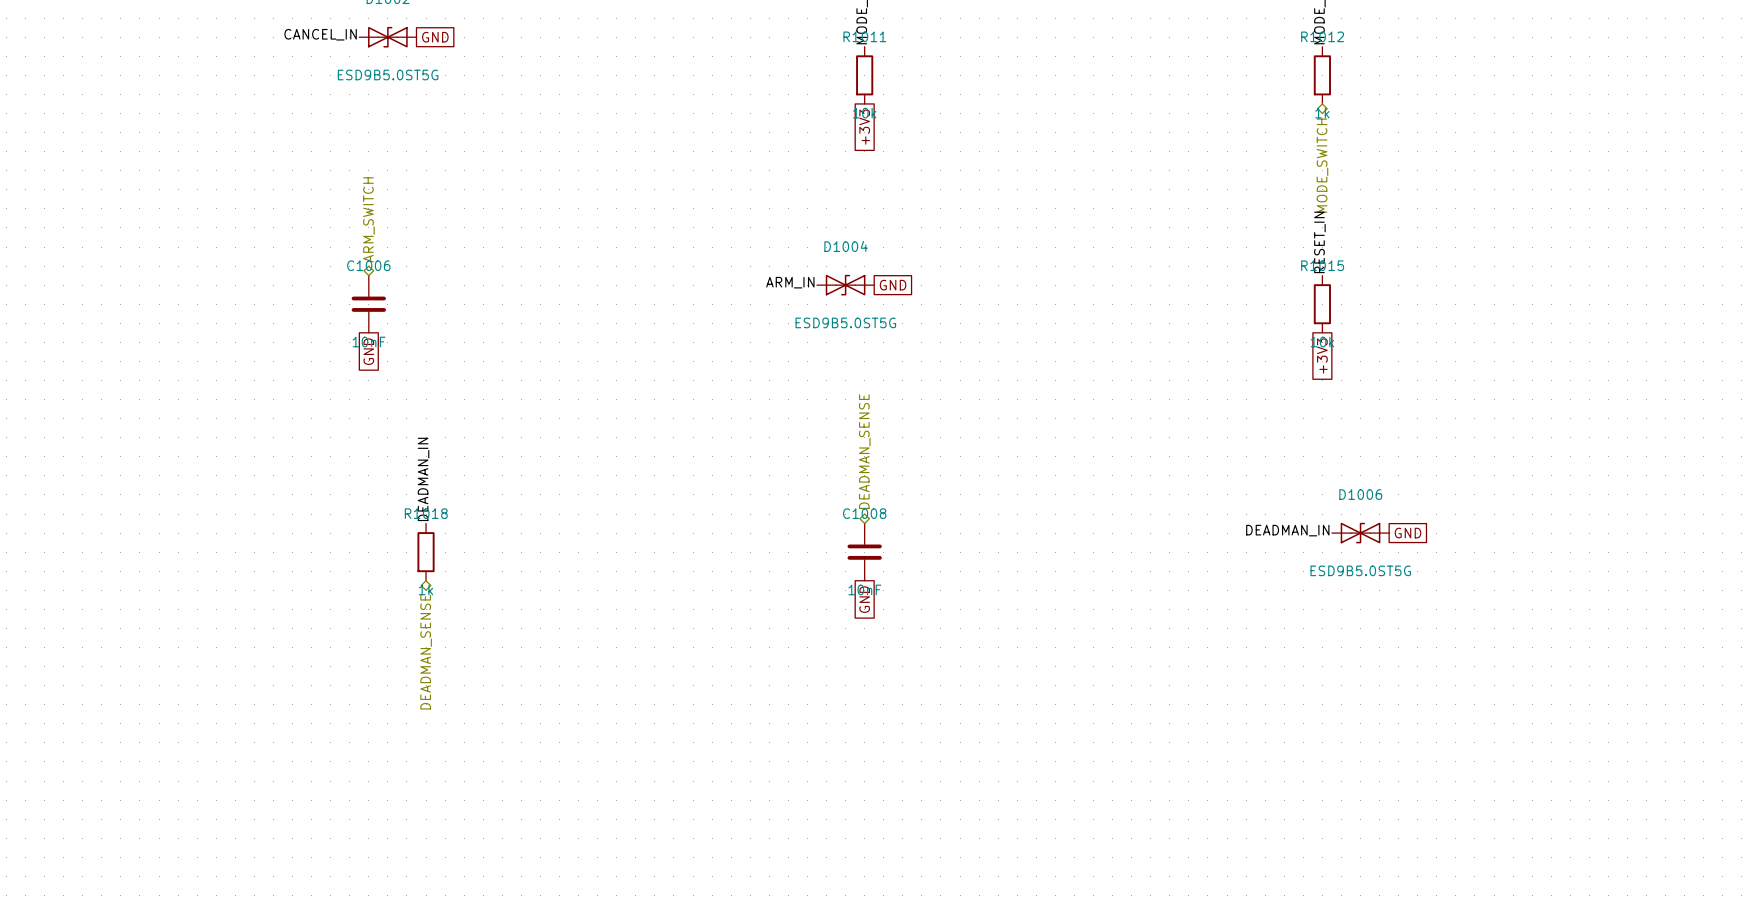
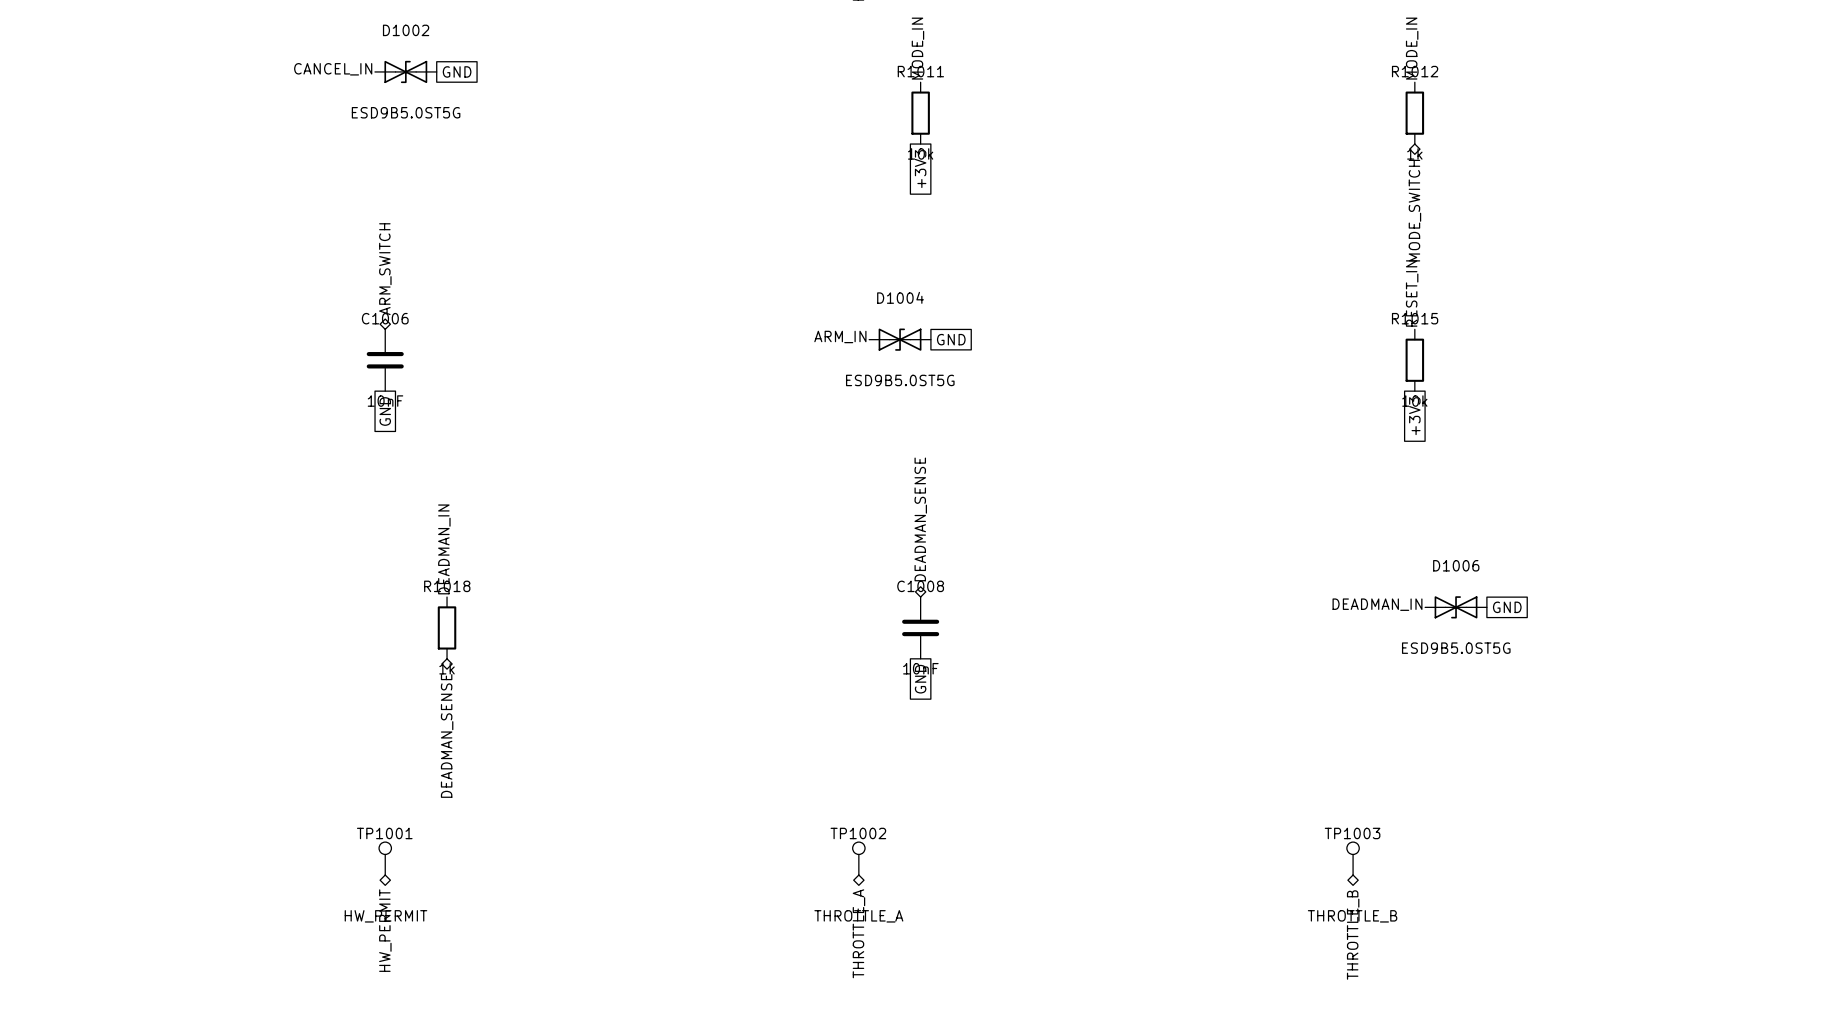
TP1001: none -> HW_PERMIT (385, 858)
TP1002: none -> THROTTLE_A (858, 858)
TP1003: none -> THROTTLE_B (1353, 858)
hierarchical label: none -> HW_PERMIT (385, 930)
hierarchical label: none -> THROTTLE_A (858, 933)
hierarchical label: none -> THROTTLE_B (1353, 935)

